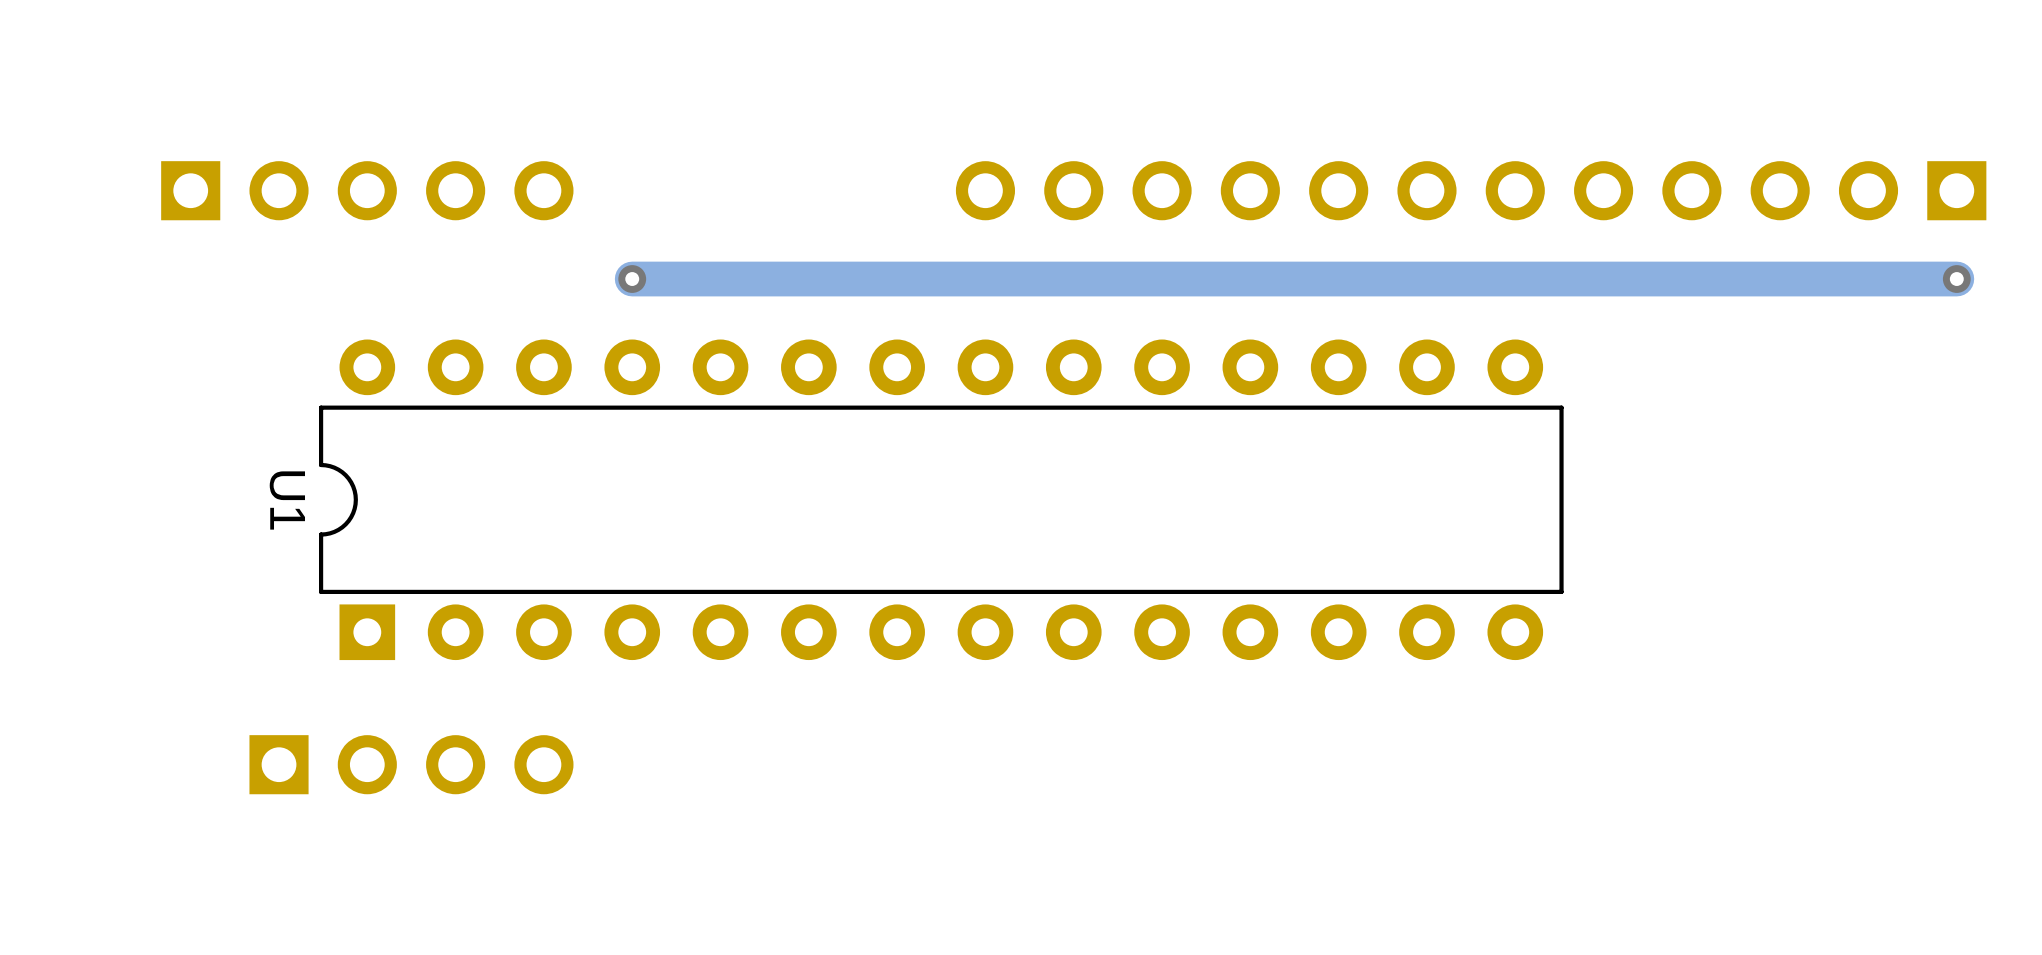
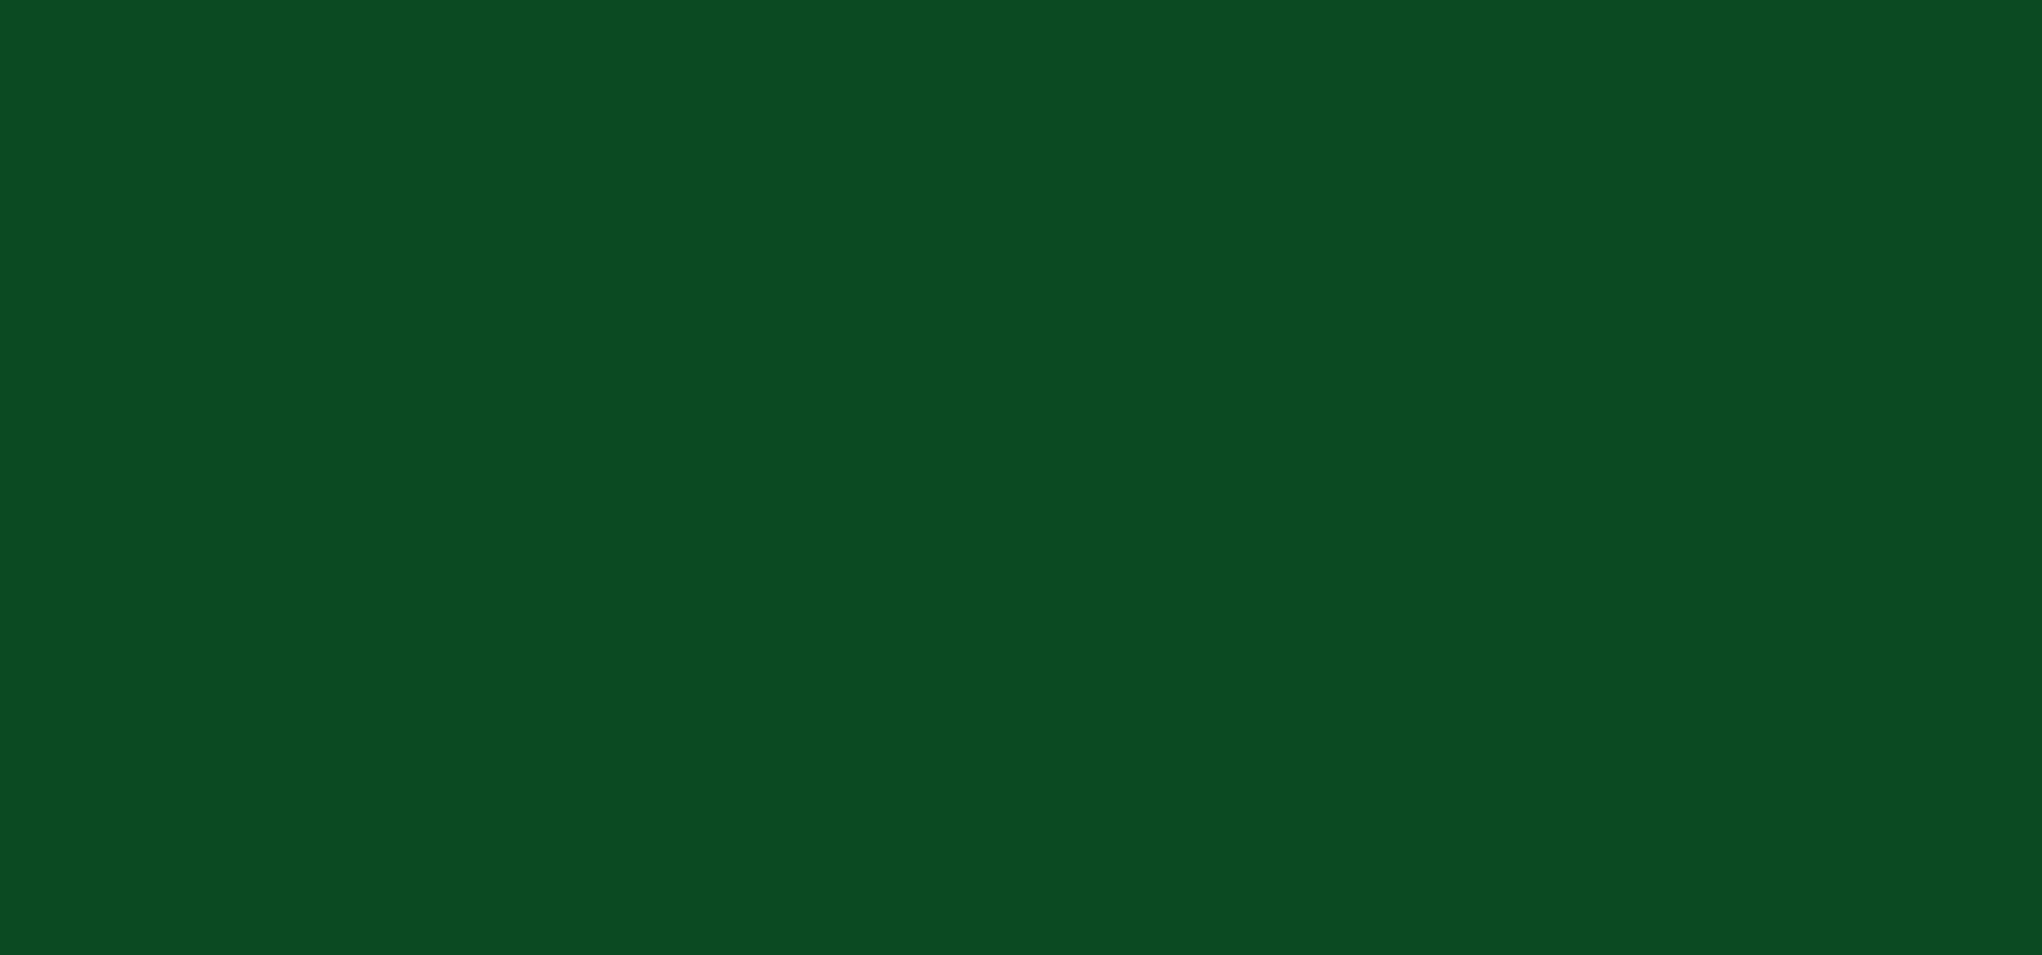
part: (367, 190) -> none
part: (1471, 190) -> none
via: (632, 279) -> none
track: (1956, 279) (632, 279) -> none
via: (1956, 279) -> none
U1: (941, 499) -> none
part: (411, 764) -> none

